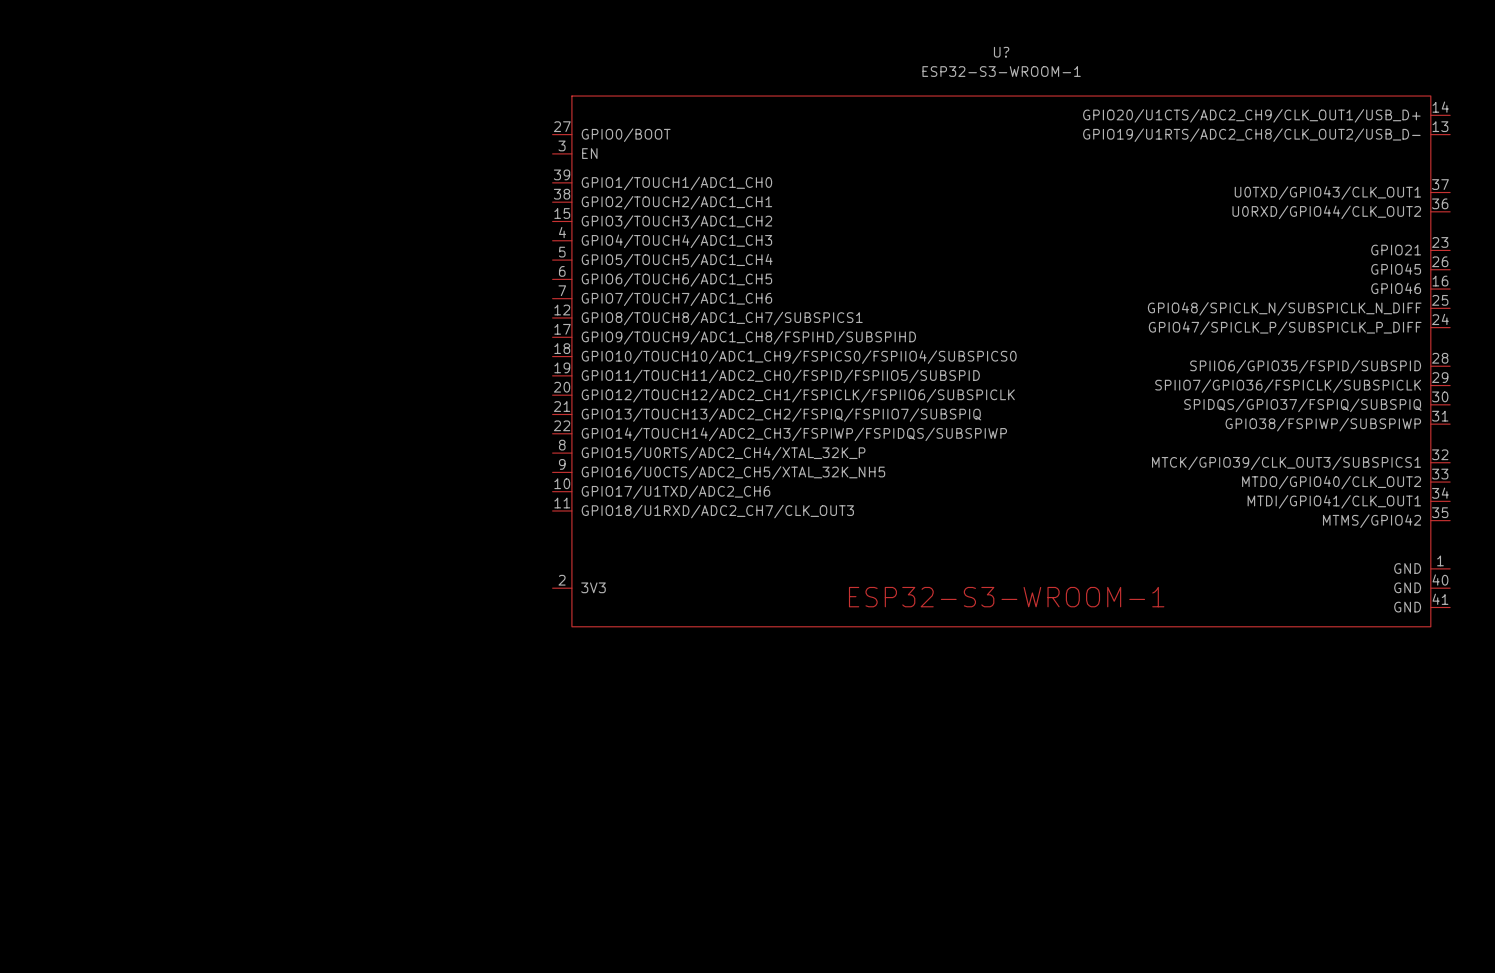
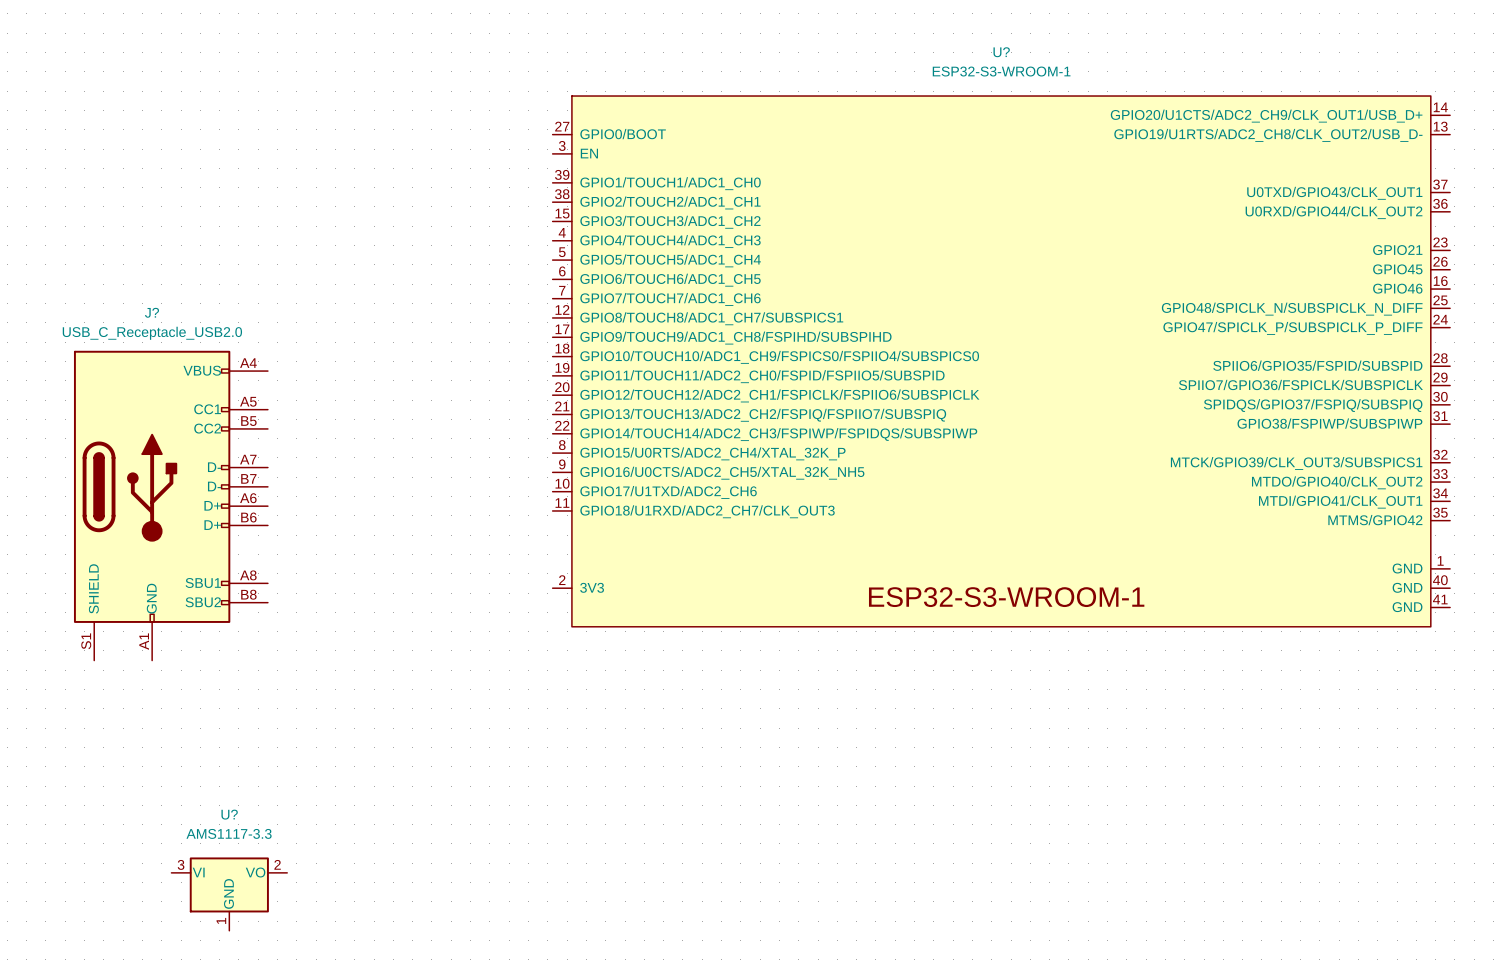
J?: none -> USB_C_Receptacle_USB2.0 (170, 505)
U?: none -> AMS1117-3.3 (229, 894)

